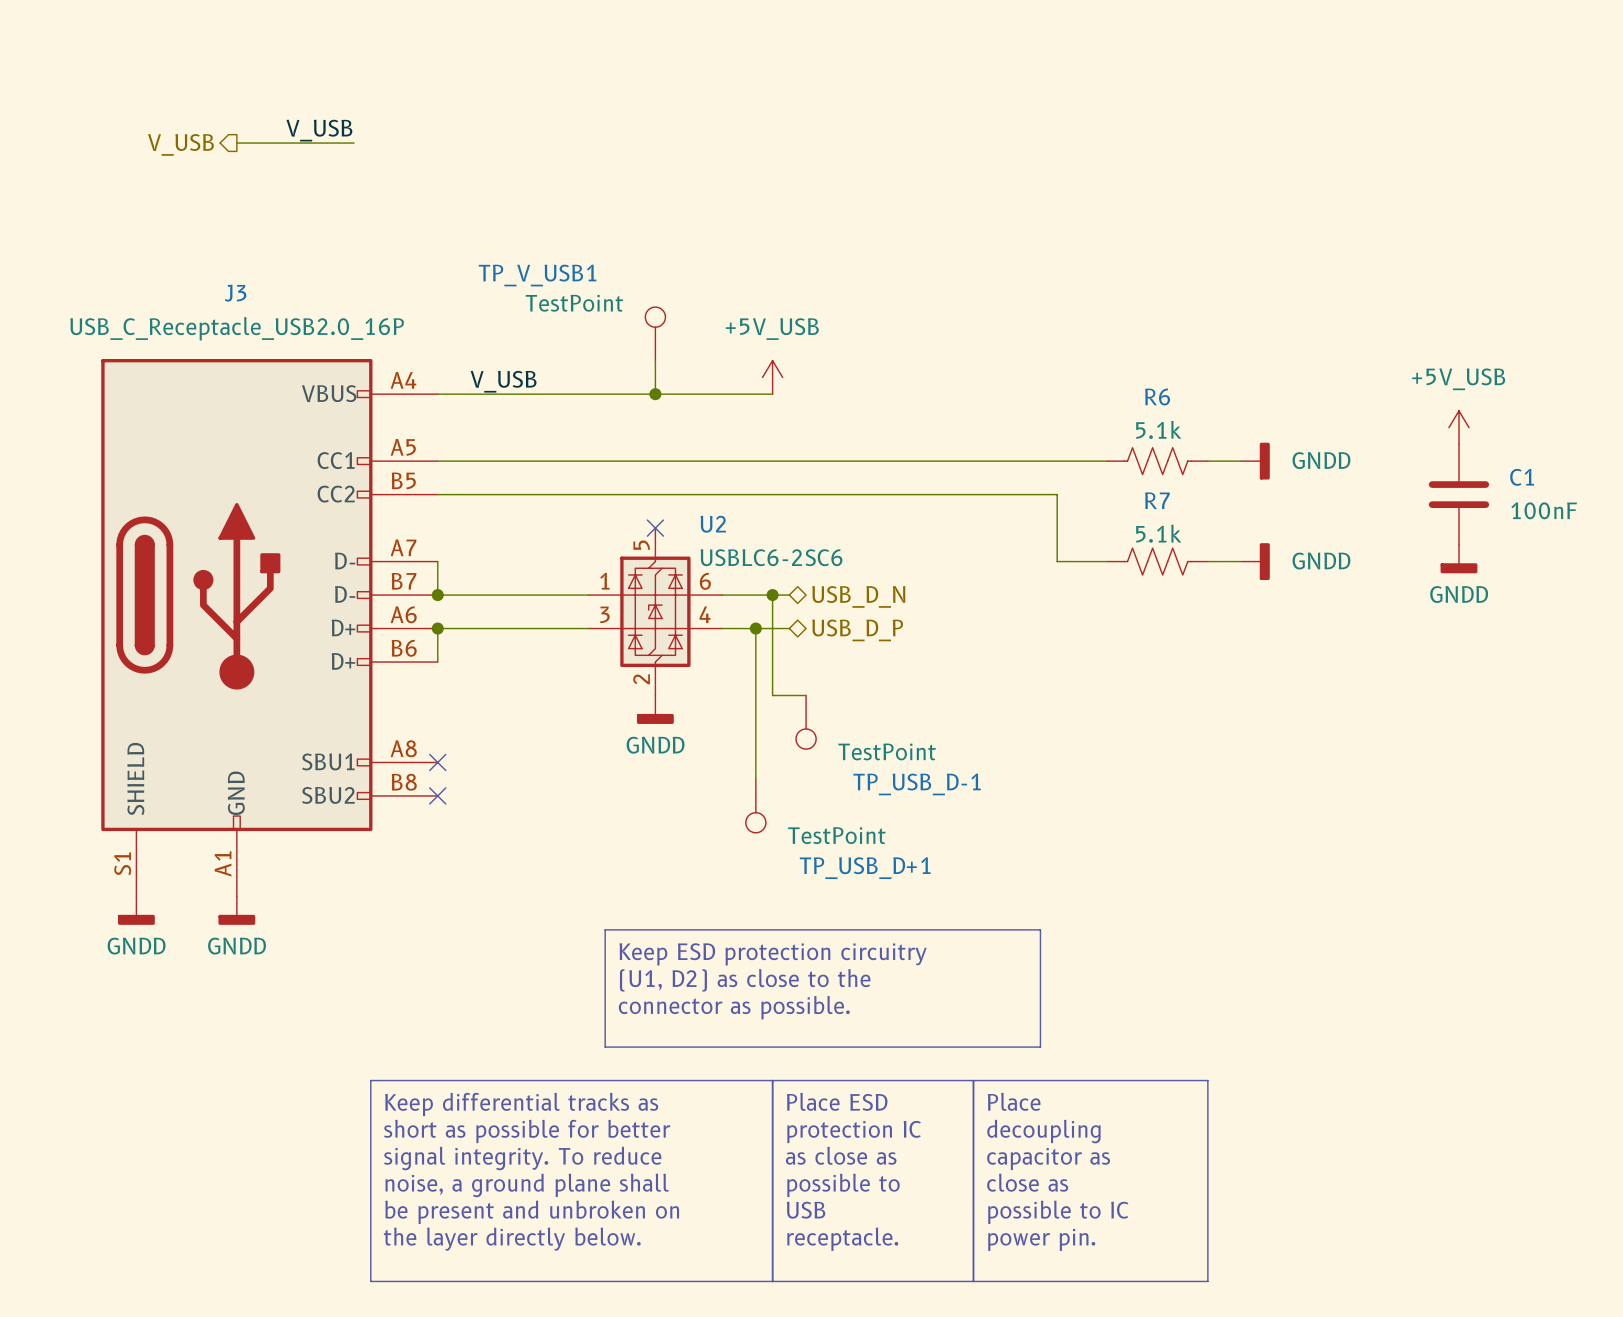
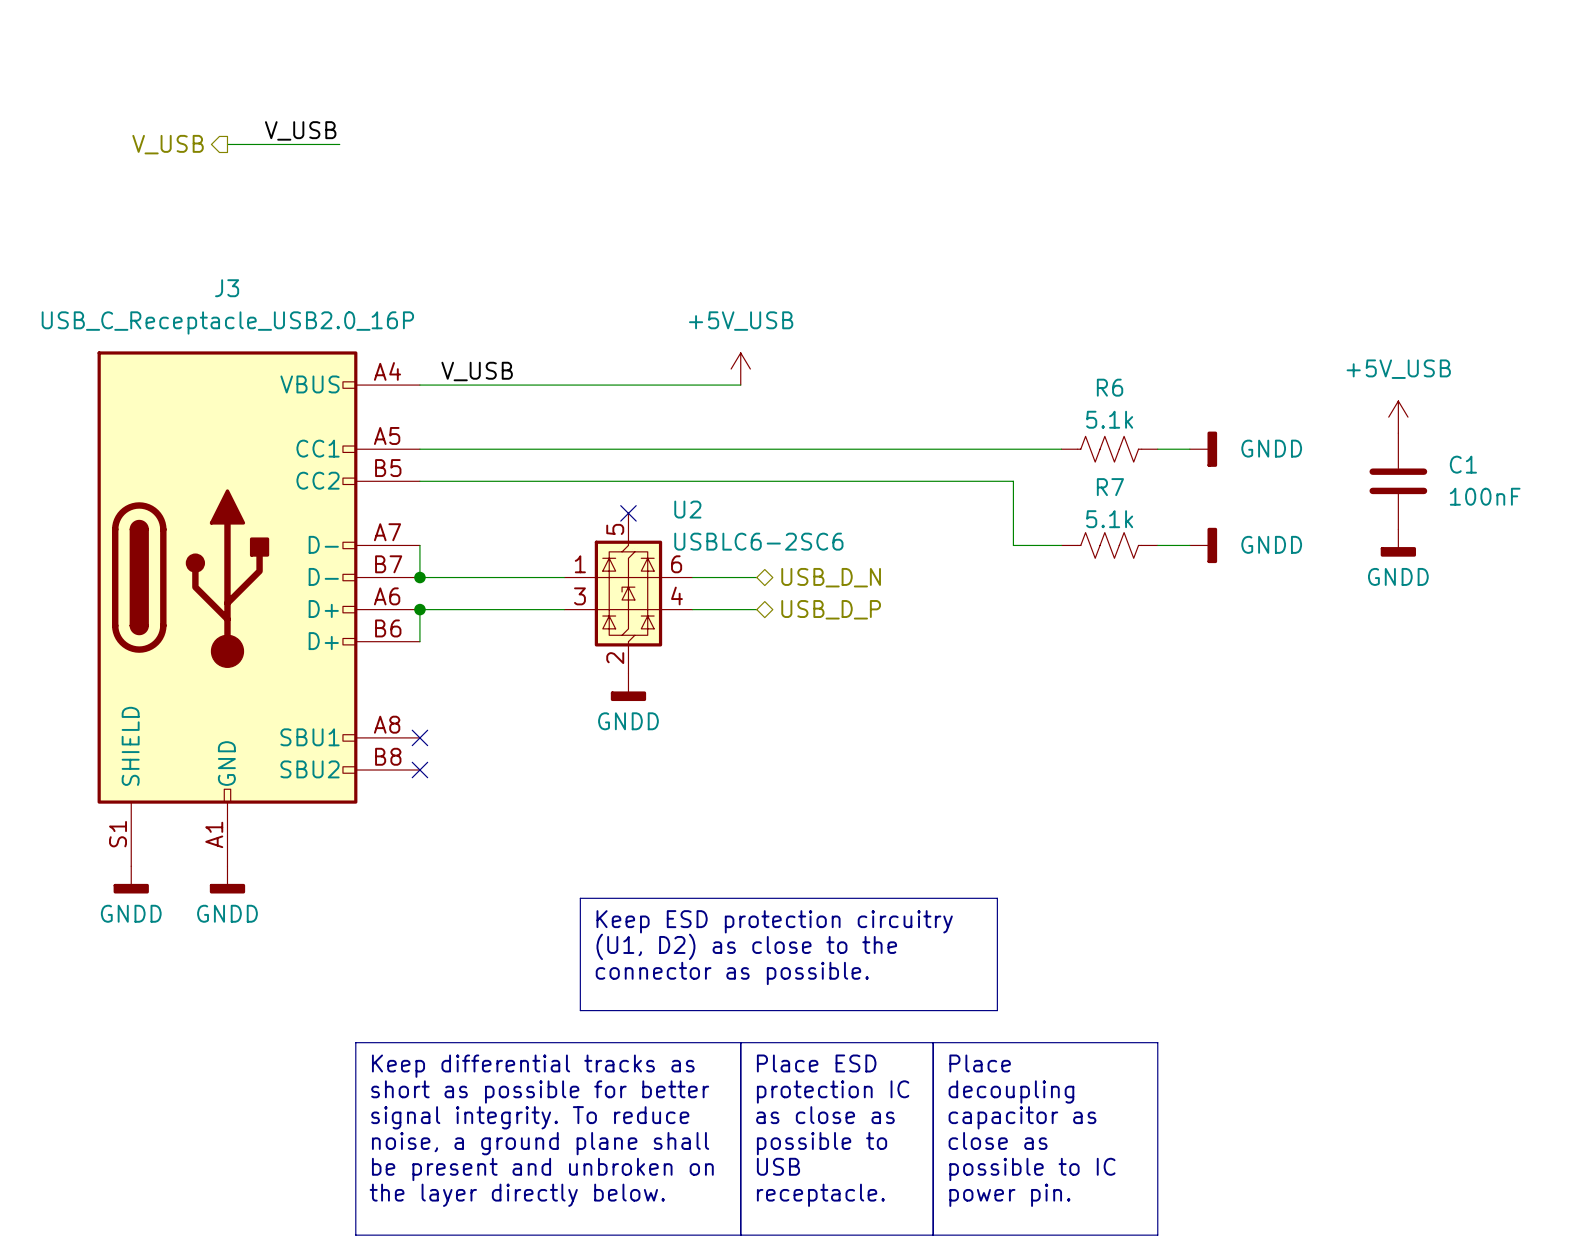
TP_V_USB1: TestPoint (655, 333) -> none
wire: (655, 360) (655, 394) -> none
junction: (655, 394) -> none
wire: (772, 595) (772, 695) (806, 695) -> none
junction: (772, 595) -> none
wire: (755, 628) (755, 779) -> none
junction: (755, 628) -> none
TP_USB_D-1: TestPoint (806, 722) -> none
TP_USB_D+1: TestPoint (755, 806) -> none

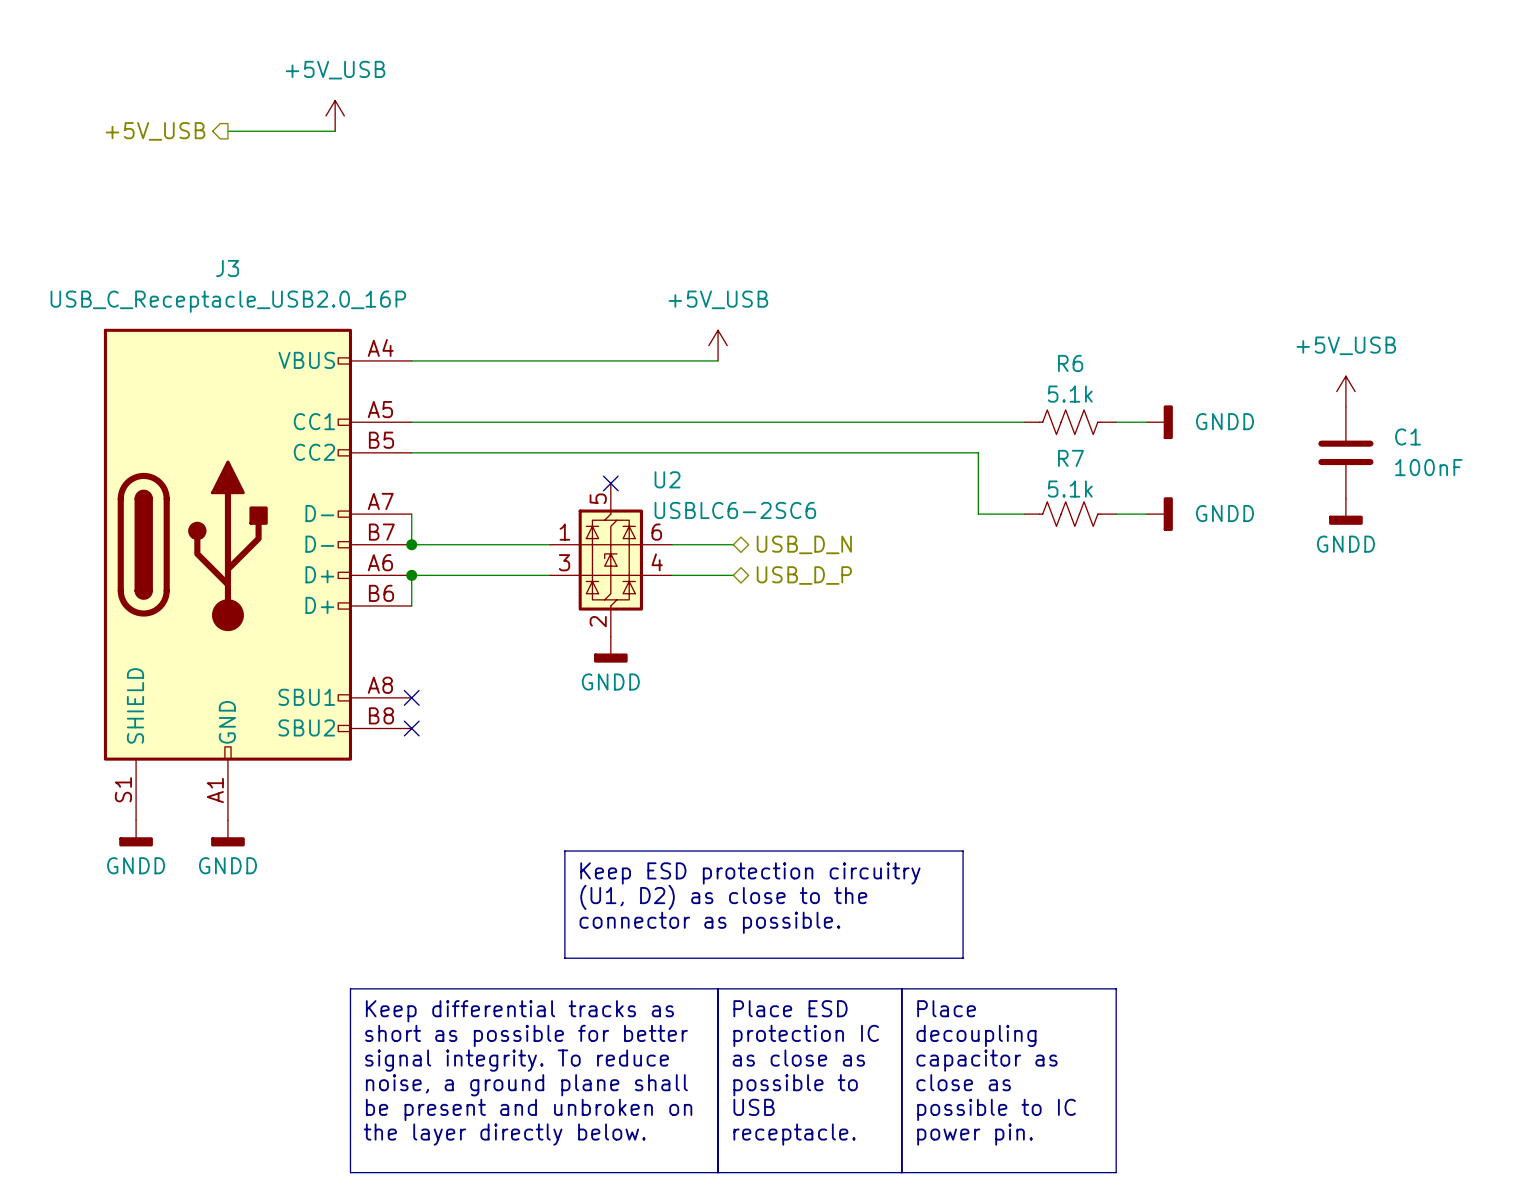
power symbol: none -> +5V_USB (335, 115)
label: V_USB (300, 130) -> none
hierarchical label: V_USB (168, 144) -> +5V_USB (155, 131)
label: V_USB (477, 371) -> none

